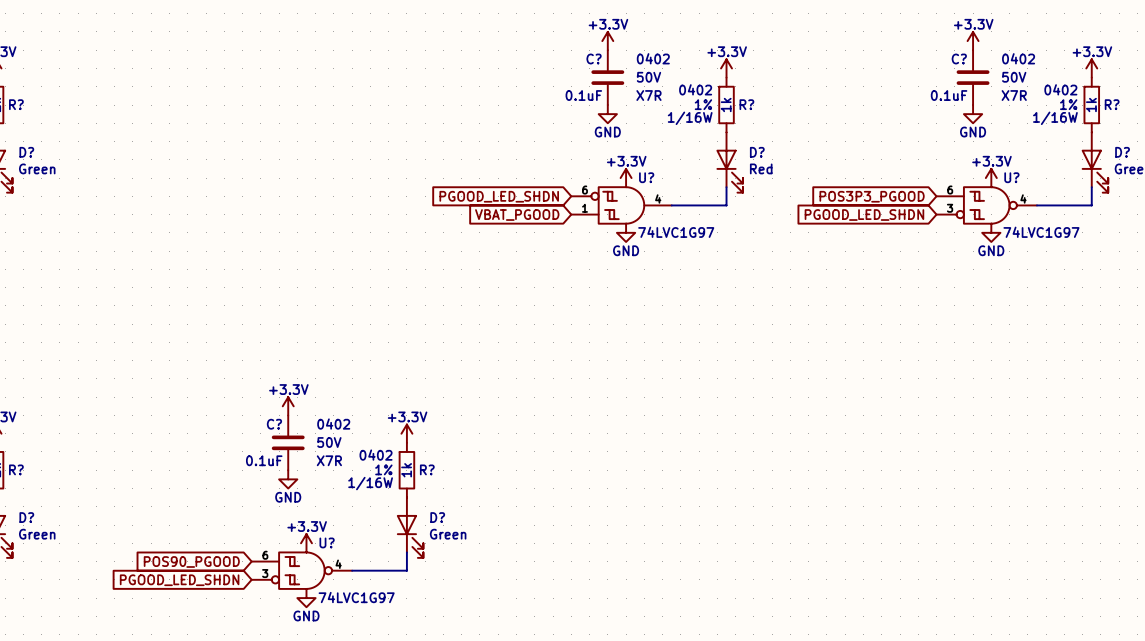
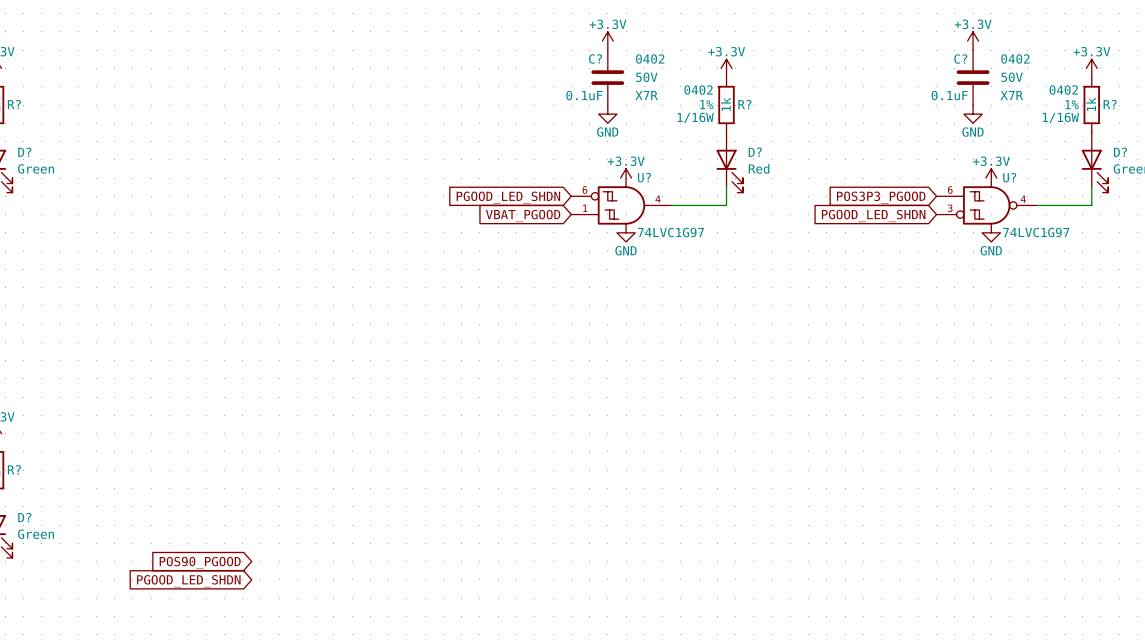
power symbol: +3.3V (288, 406) -> none
power symbol: +3.3V (406, 433) -> none
C?: 0.1uF (288, 442) -> none
R?: 1k (406, 470) -> none
power symbol: GND (288, 479) -> none
D?: Green (410, 527) -> none
power symbol: +3.3V (306, 543) -> none
wire: (406, 552) (406, 570) (352, 570) -> none
U?: 74LVC1G97 (301, 570) -> none
power symbol: GND (306, 598) -> none

